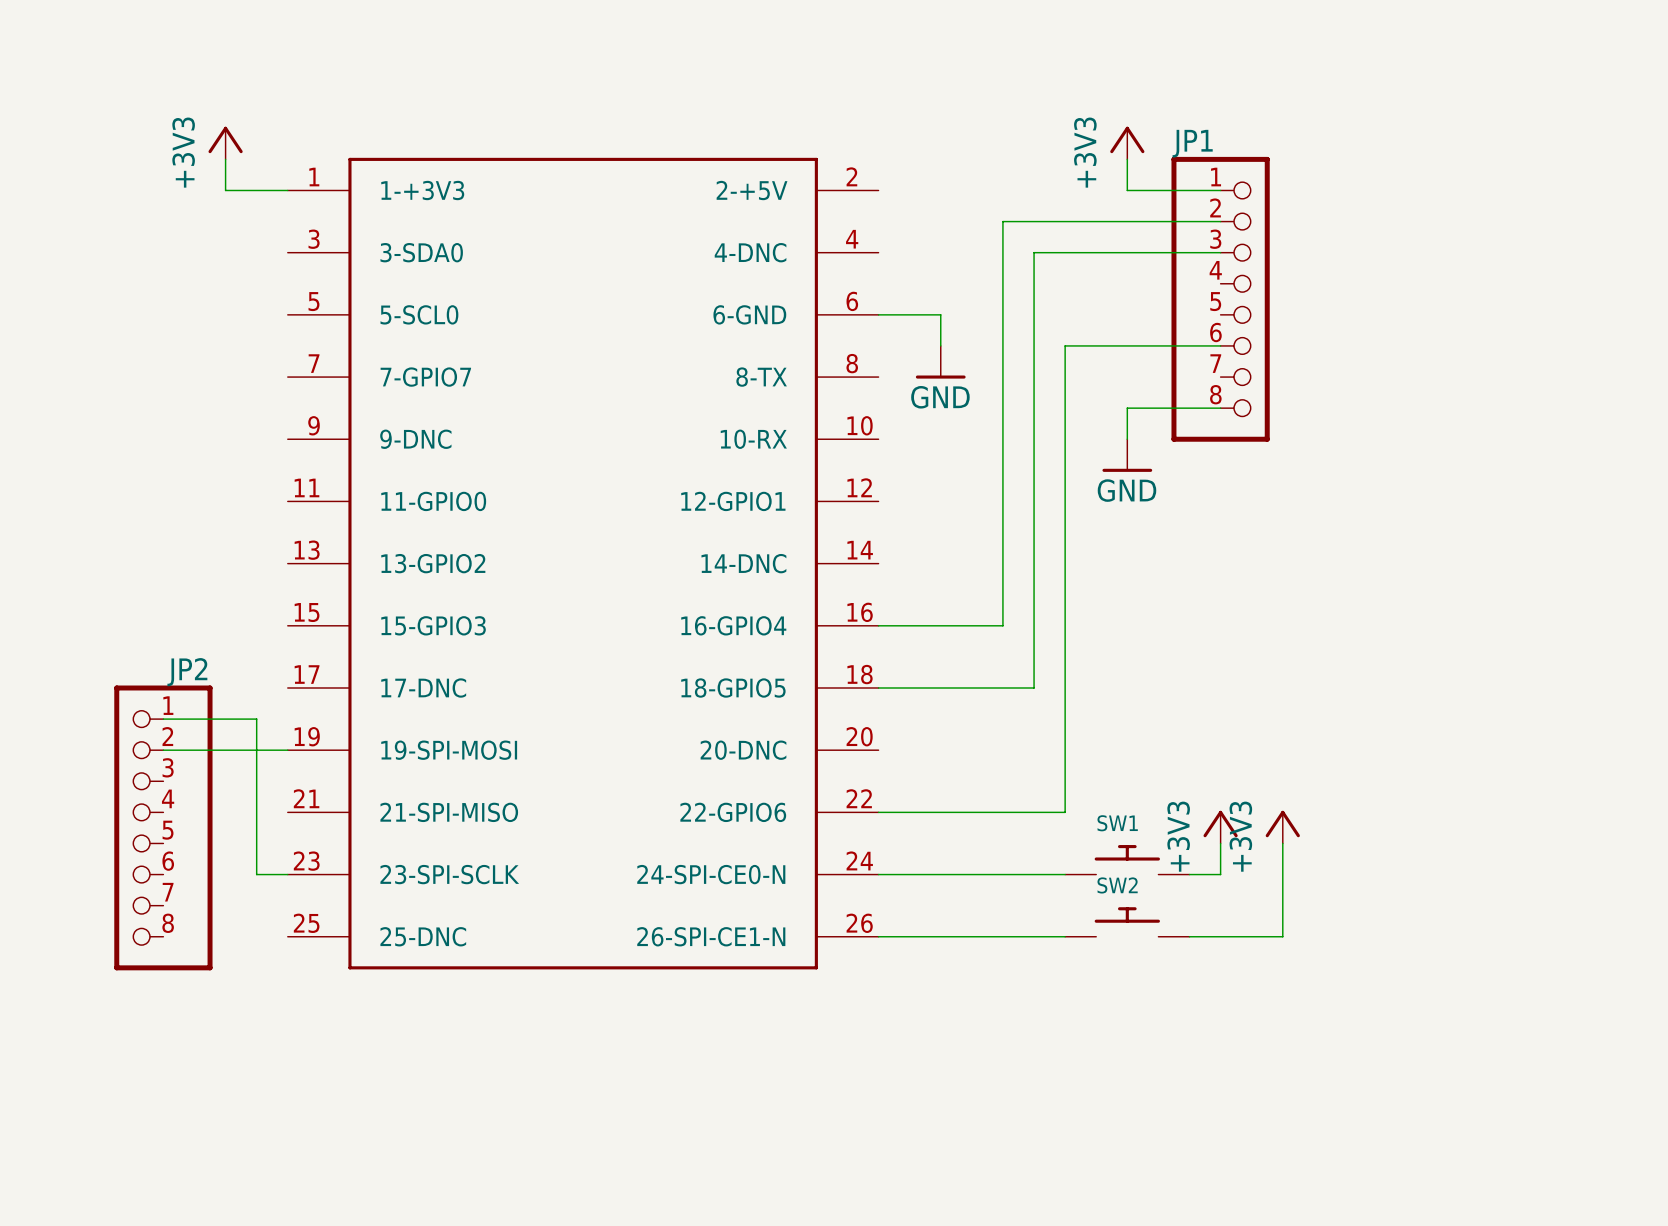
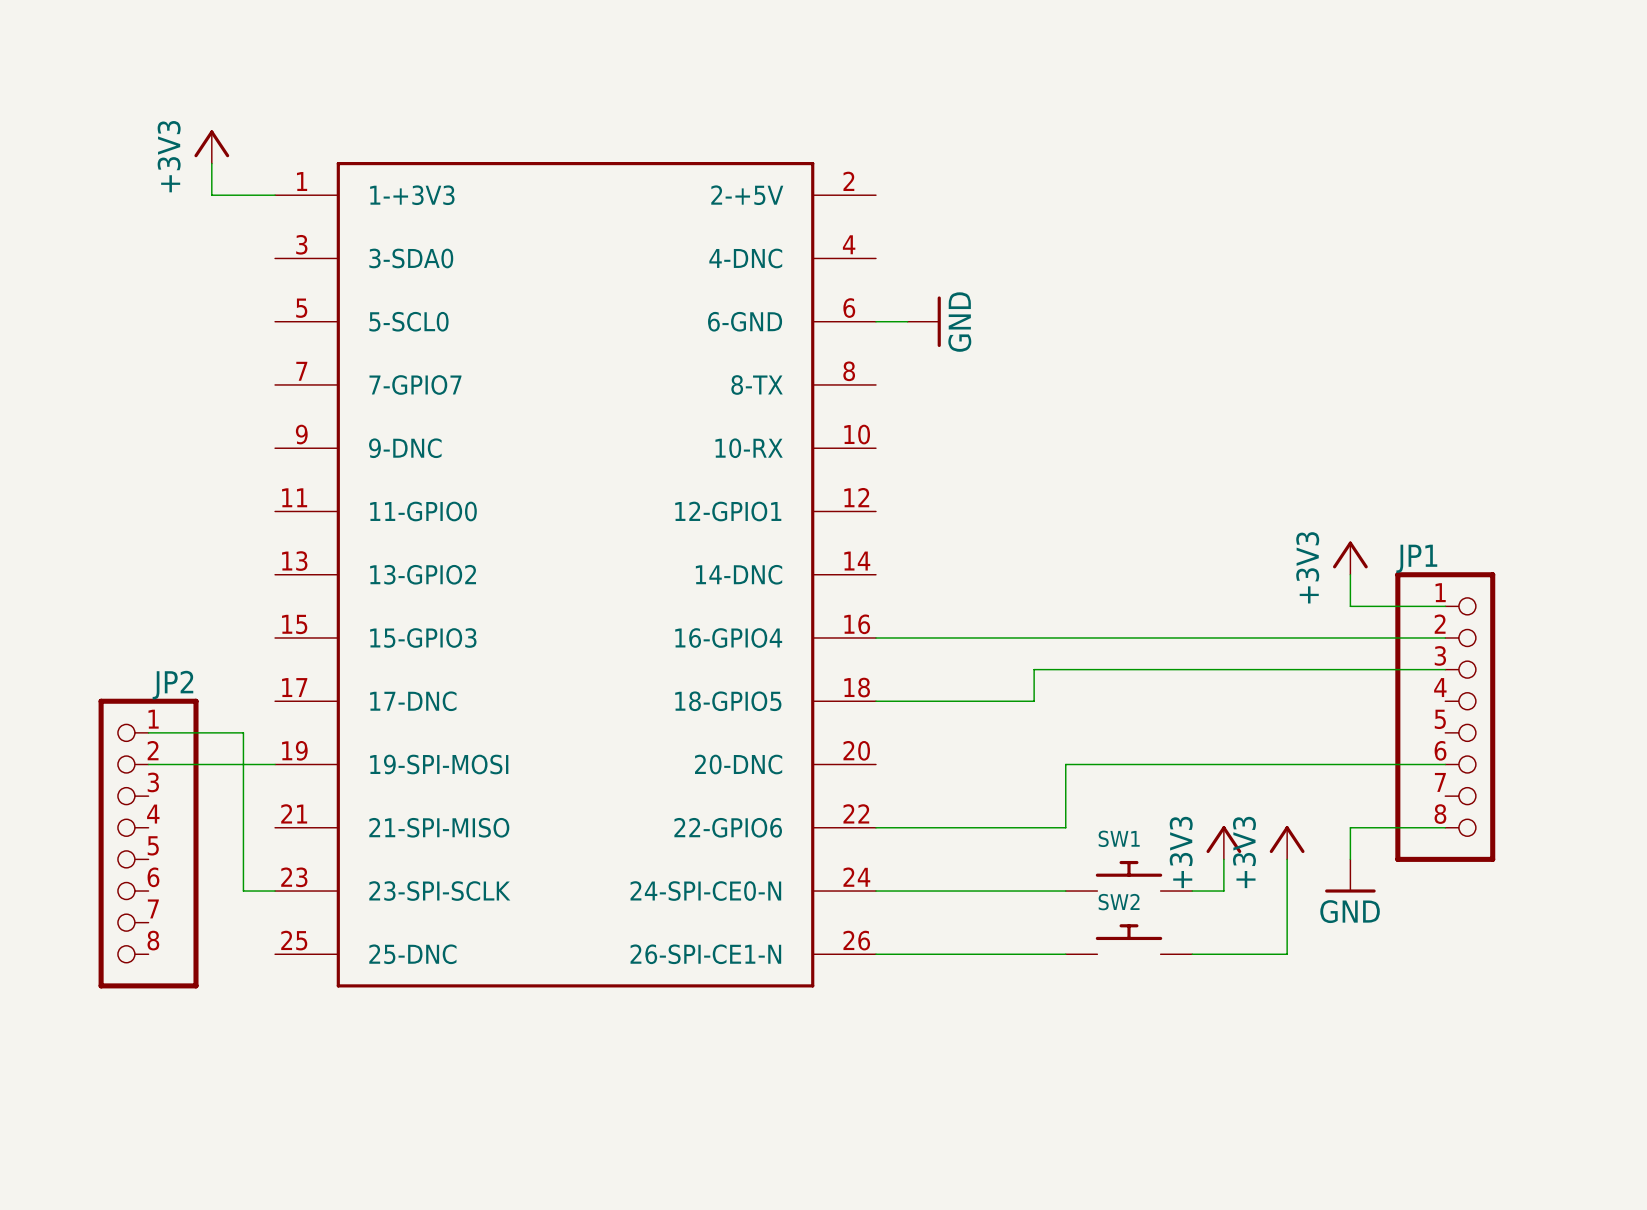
power symbol: +3V3 (1127, 143) -> none
wire: (1127, 159) (1127, 190) (1220, 190) -> none
wire: (1220, 221) (1002, 221) (1002, 625) -> (1445, 637) (1002, 637)
wire: (1220, 252) (1034, 252) (1034, 656) -> (1445, 669) (1034, 669)
JP1 position: (1220, 299) -> (1445, 717)
wire: (1220, 345) (1065, 345) (1065, 750) -> (1445, 764) (1065, 764)
power symbol position: GND (940, 362) -> GND (924, 321)
power symbol rotation: 0° (940, 377) -> 90° counterclockwise (939, 321)
wire: (1220, 408) (1127, 408) (1127, 439) -> none
power symbol: GND (1127, 455) -> none
power symbol: none -> +3V3 (1350, 558)
wire: none -> (1350, 574) (1350, 606) (1445, 606)
wire: none -> (1445, 827) (1350, 827) (1350, 859)
power symbol: none -> GND (1350, 875)

